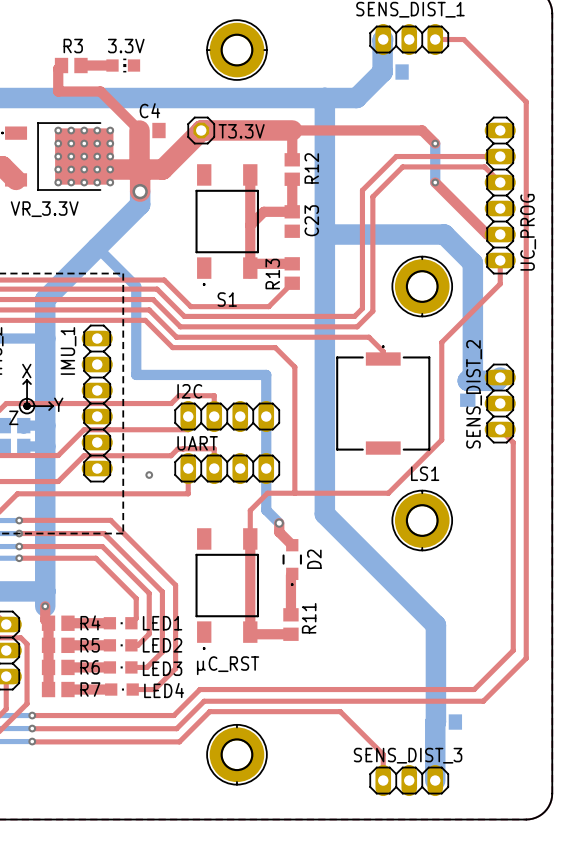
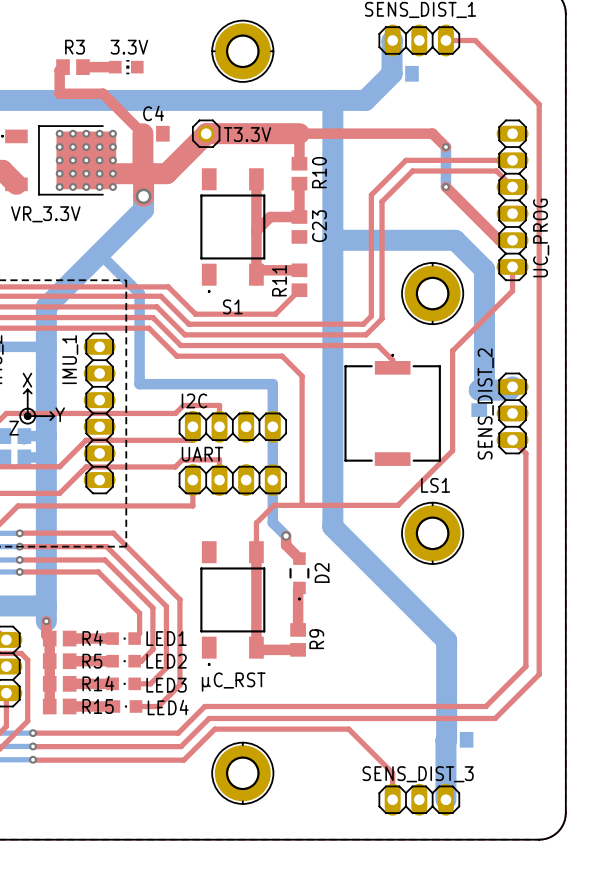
R12 name: R12 (311, 168) -> R10 (319, 172)
R13 name: R13 (272, 274) -> R11 (279, 280)
via: (149, 475) -> none
R11 name: R11 (309, 618) -> R9 (316, 639)
R6 name: R6 (90, 667) -> R14 (98, 683)
R7 name: R7 (90, 689) -> R15 (98, 706)

